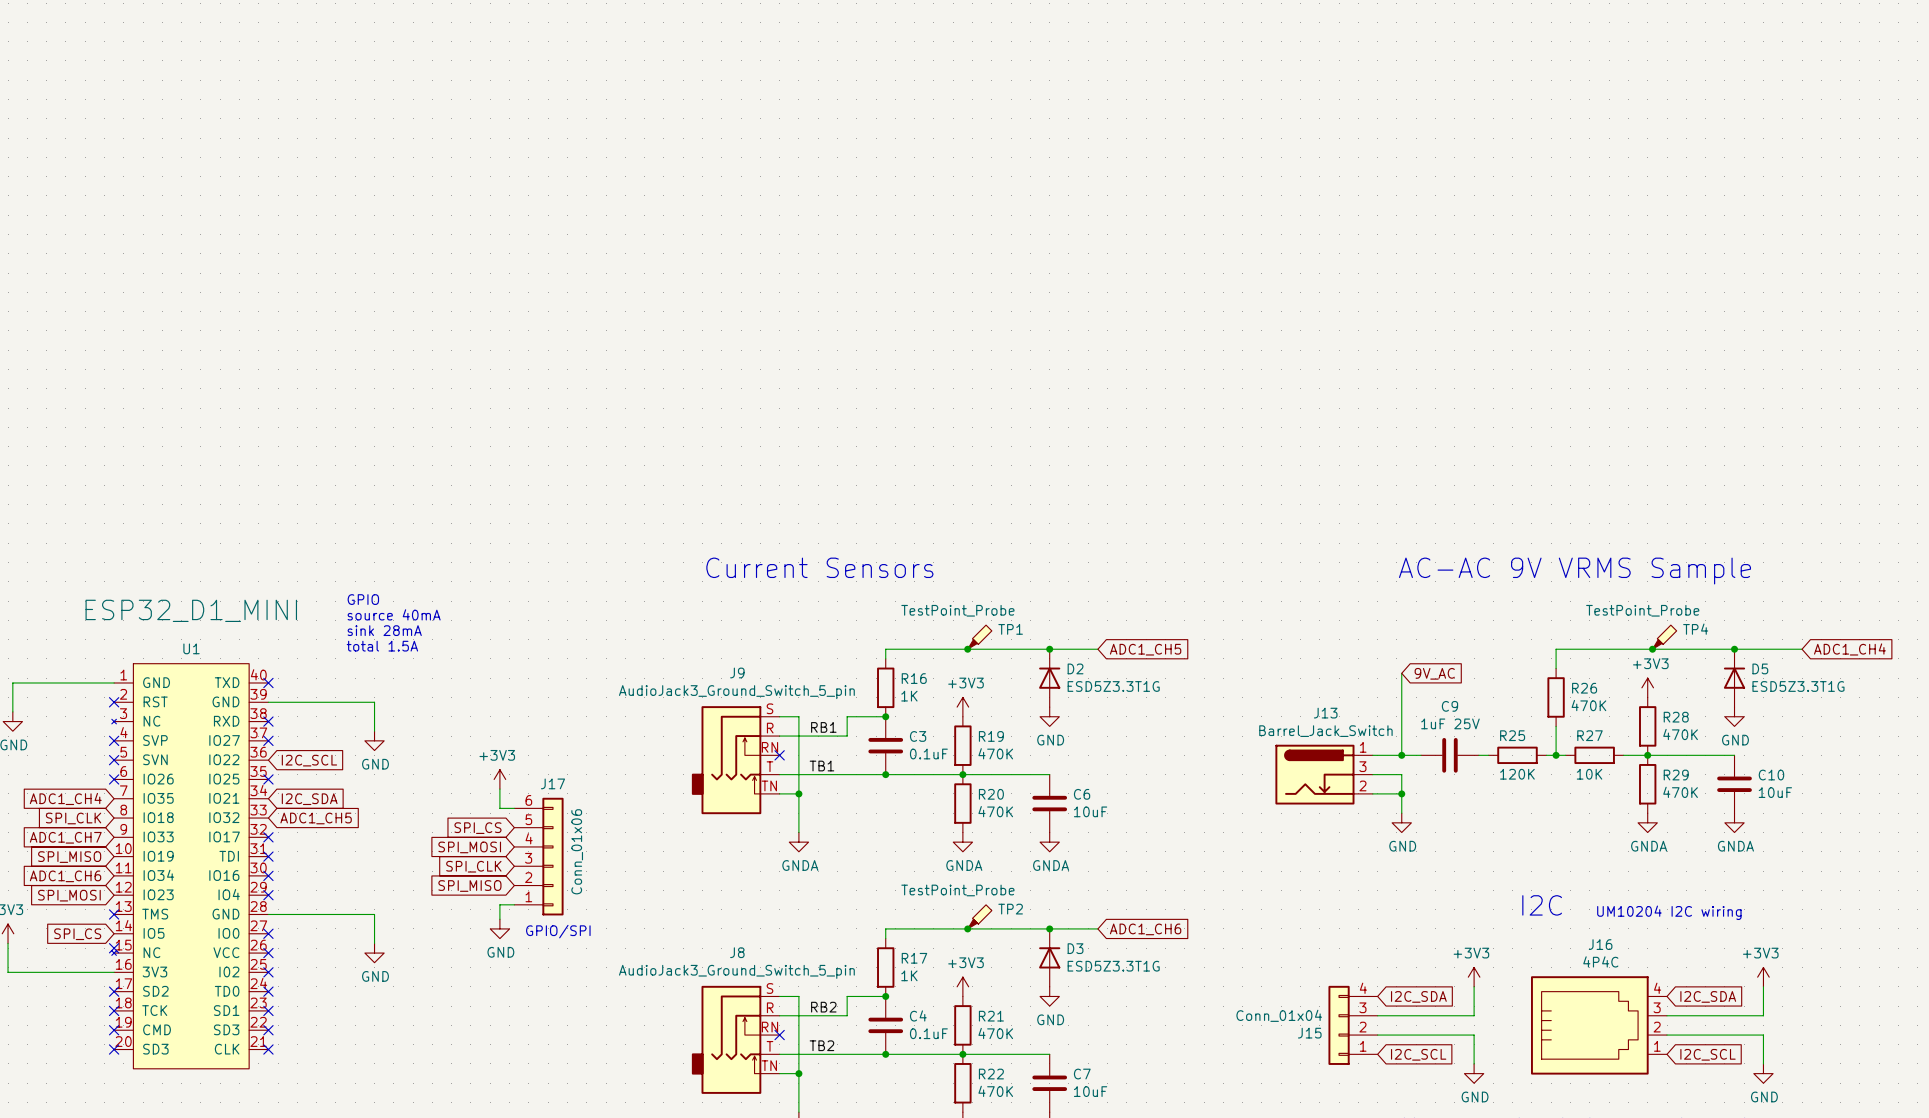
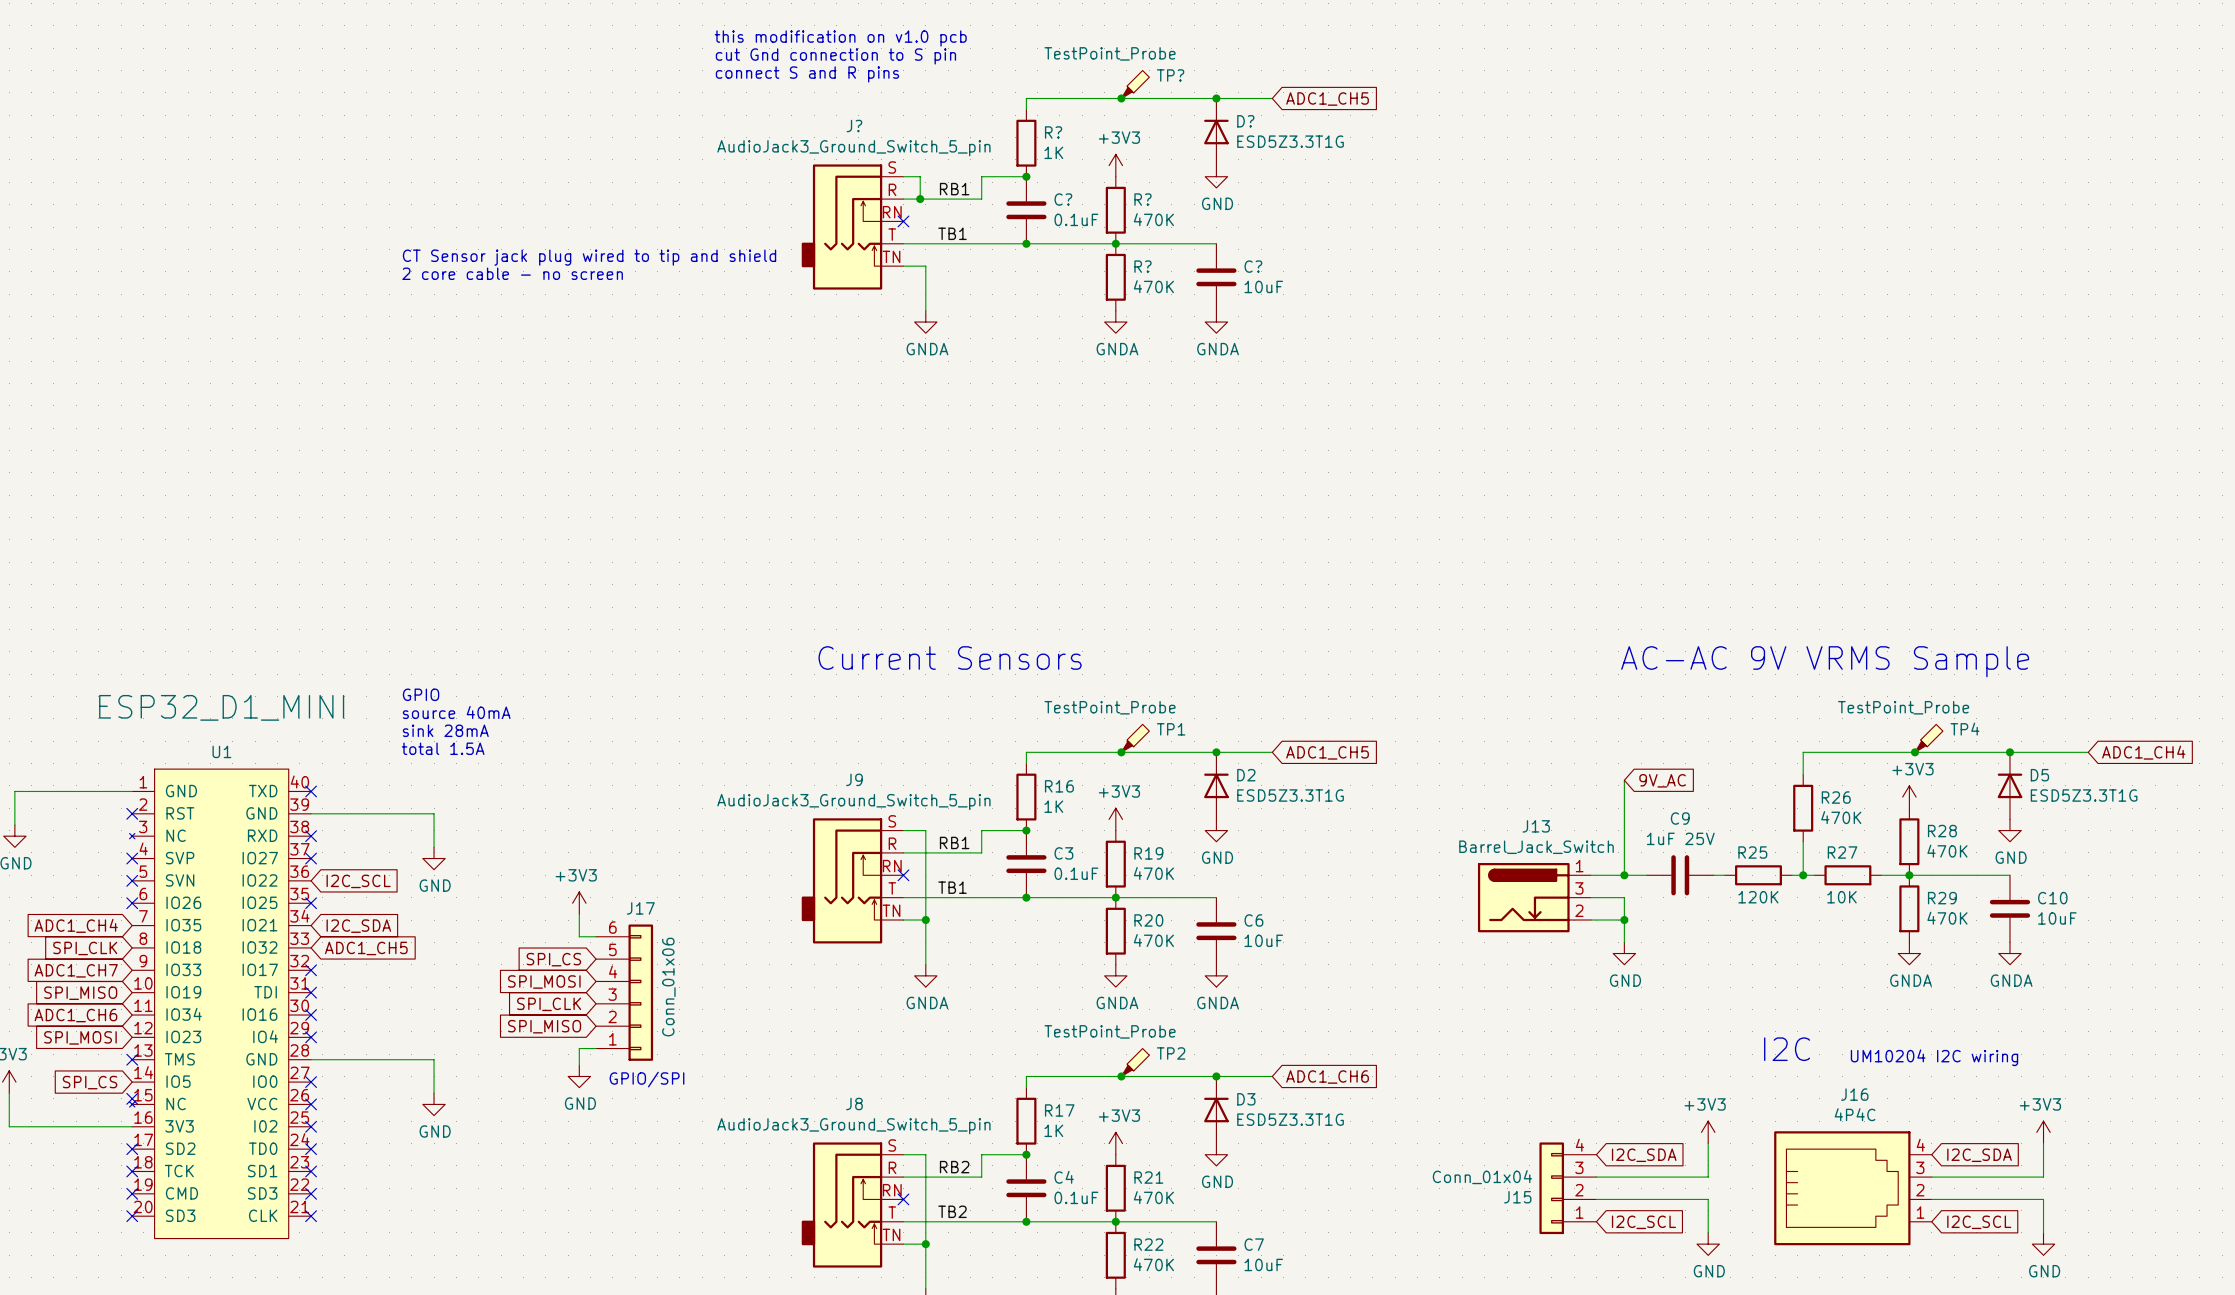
text: none -> this modification on v1.0 pcb (840, 38)
text: none -> cut Gnd connection to S pin (835, 56)
text: none -> connect S and R pins (807, 74)
TP?: none -> TestPoint_Probe (1135, 84)
junction: none -> (1121, 98)
junction: none -> (1216, 98)
wire: none -> (1272, 98) (1026, 98) (1026, 109)
global label: none -> ADC1_CH5 (1327, 99)
D?: none -> ESD5Z3.3T1G (1216, 132)
R?: none -> 1K (1026, 143)
power symbol: none -> +3V3 (1115, 165)
wire: none -> (903, 176) (920, 176) (920, 199)
wire: none -> (1026, 176) (981, 176) (981, 199) (903, 199)
junction: none -> (1026, 176)
power symbol: none -> GND (1216, 176)
label: none -> RB1 (954, 189)
junction: none -> (920, 199)
C?: none -> 0.1uF (1026, 210)
R?: none -> 470K (1115, 210)
no-connect mark: none -> (903, 221)
J?: none -> AudioJack3_Ground_Switch_5_pin (852, 227)
label: none -> TB1 (952, 233)
wire: none -> (903, 243) (1216, 243)
junction: none -> (1026, 243)
junction: none -> (1115, 243)
text: none -> CT Sensor jack plug wired to tip and shield (589, 257)
wire: none -> (903, 266) (925, 266) (925, 310)
text: none -> 2 core cable - no screen (512, 273)
R?: none -> 470K (1115, 277)
C?: none -> 10uF (1216, 277)
power symbol: none -> GNDA (925, 322)
power symbol: none -> GNDA (1115, 322)
power symbol: none -> GNDA (1216, 322)

